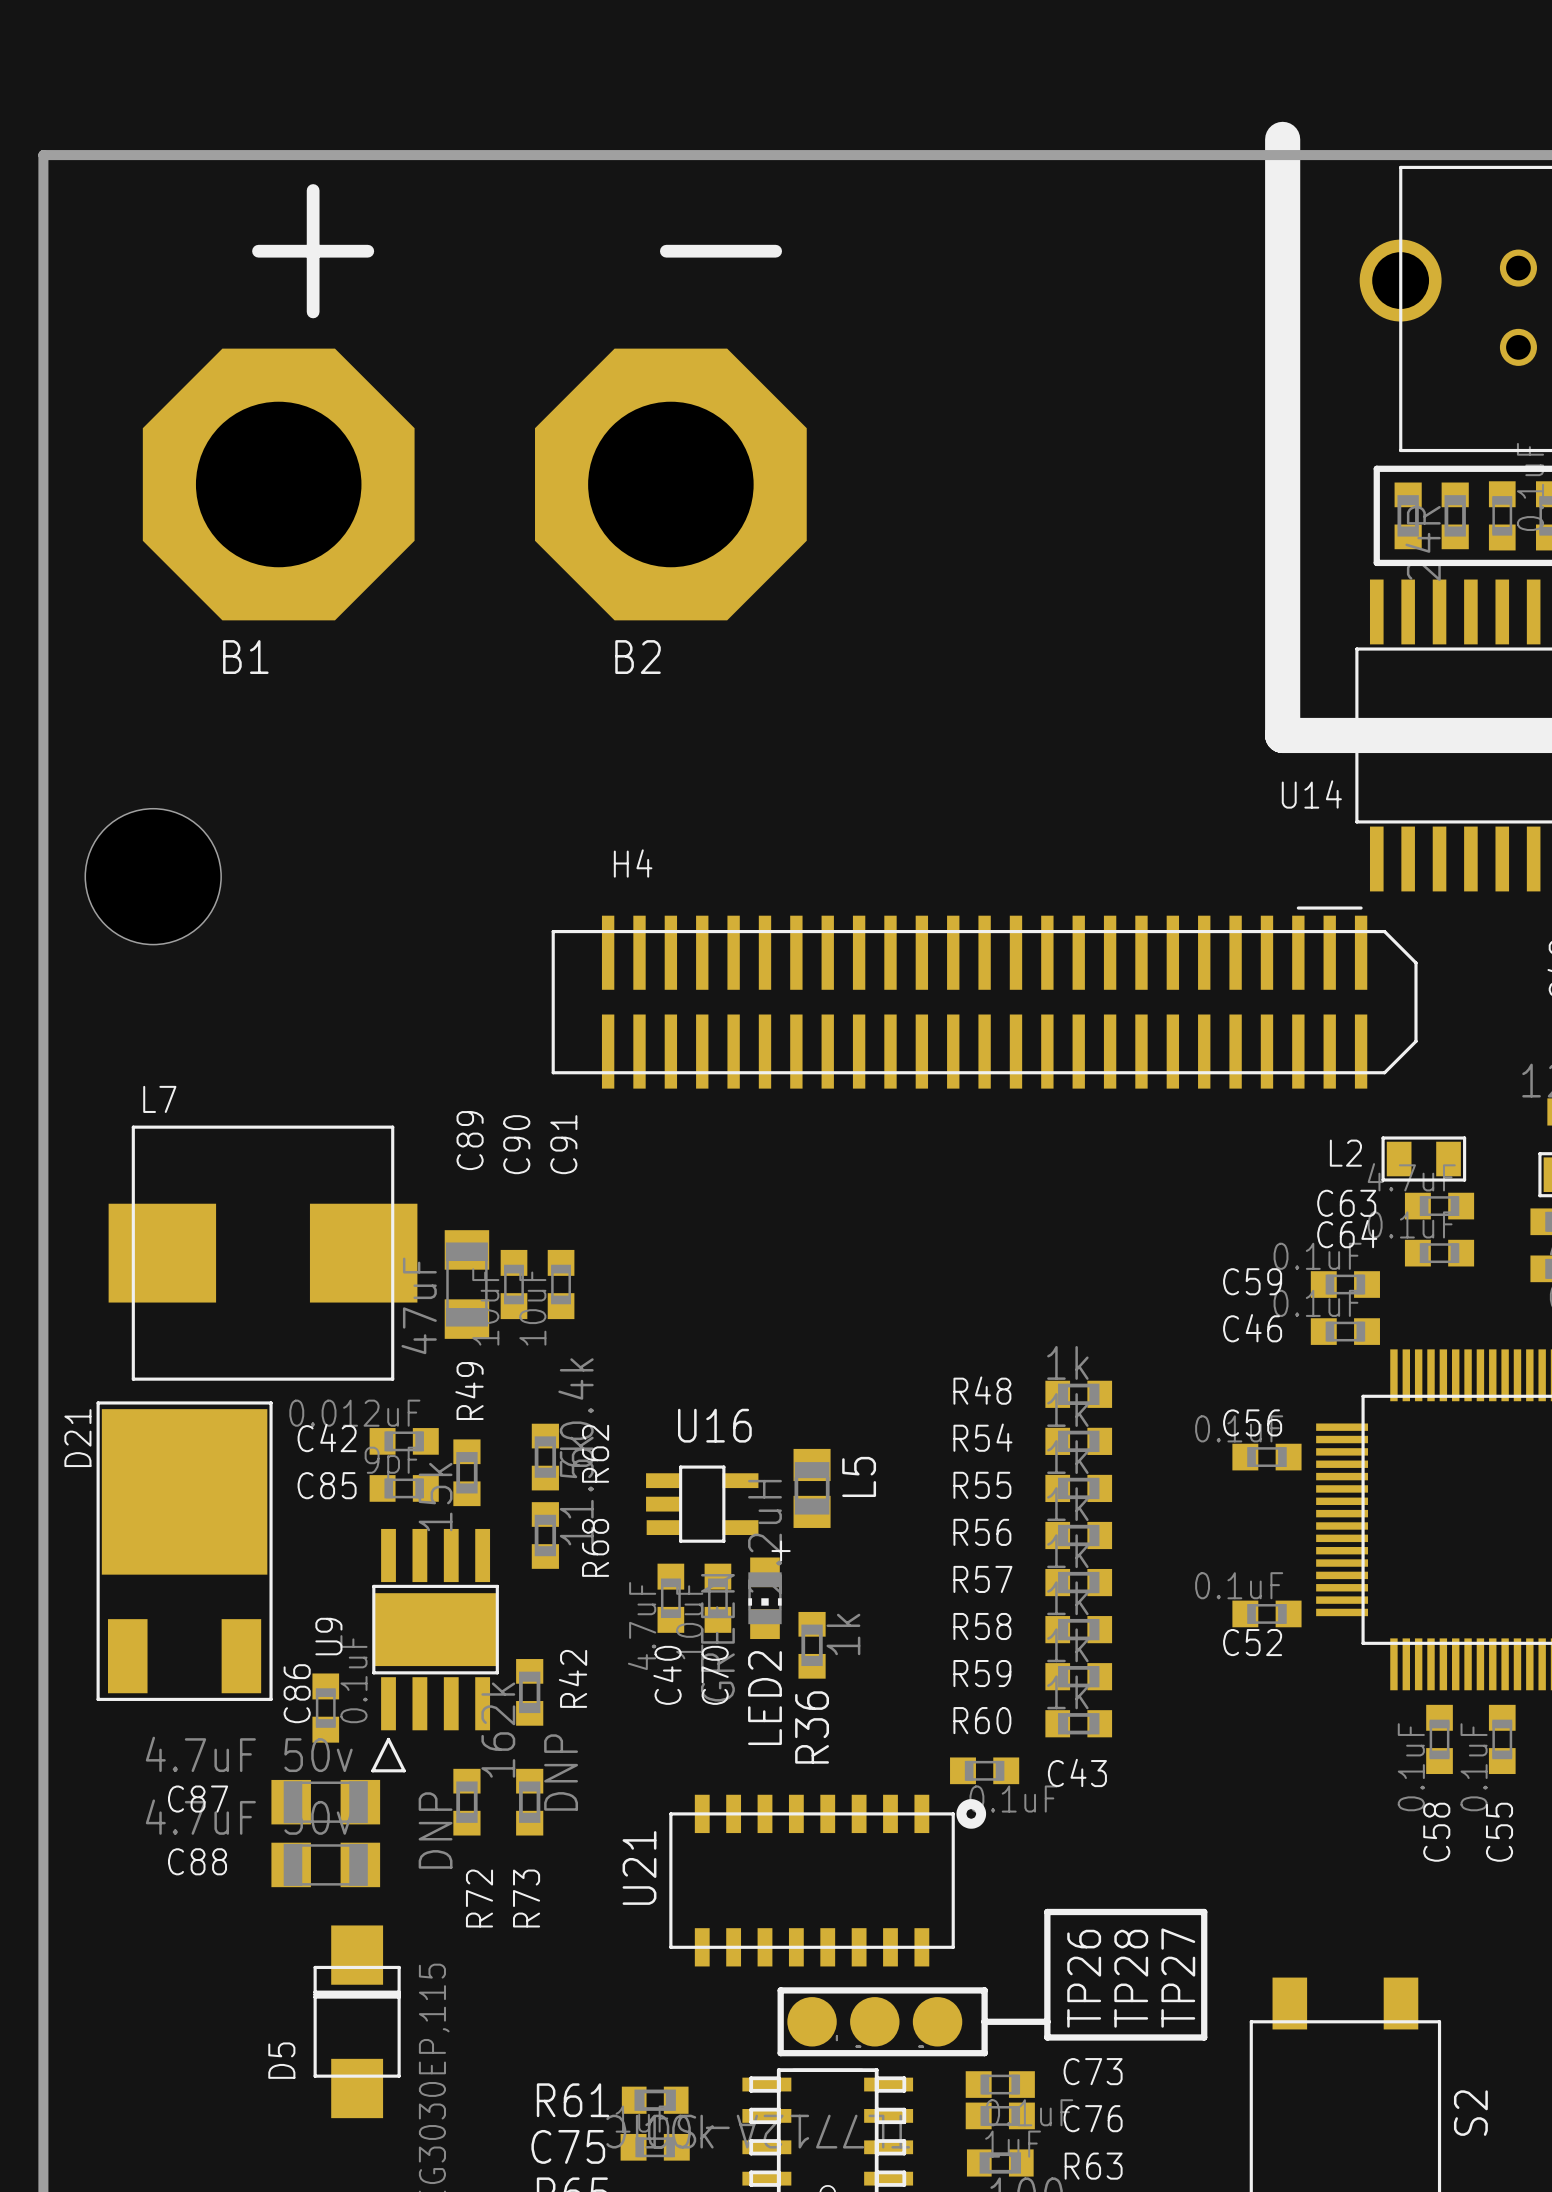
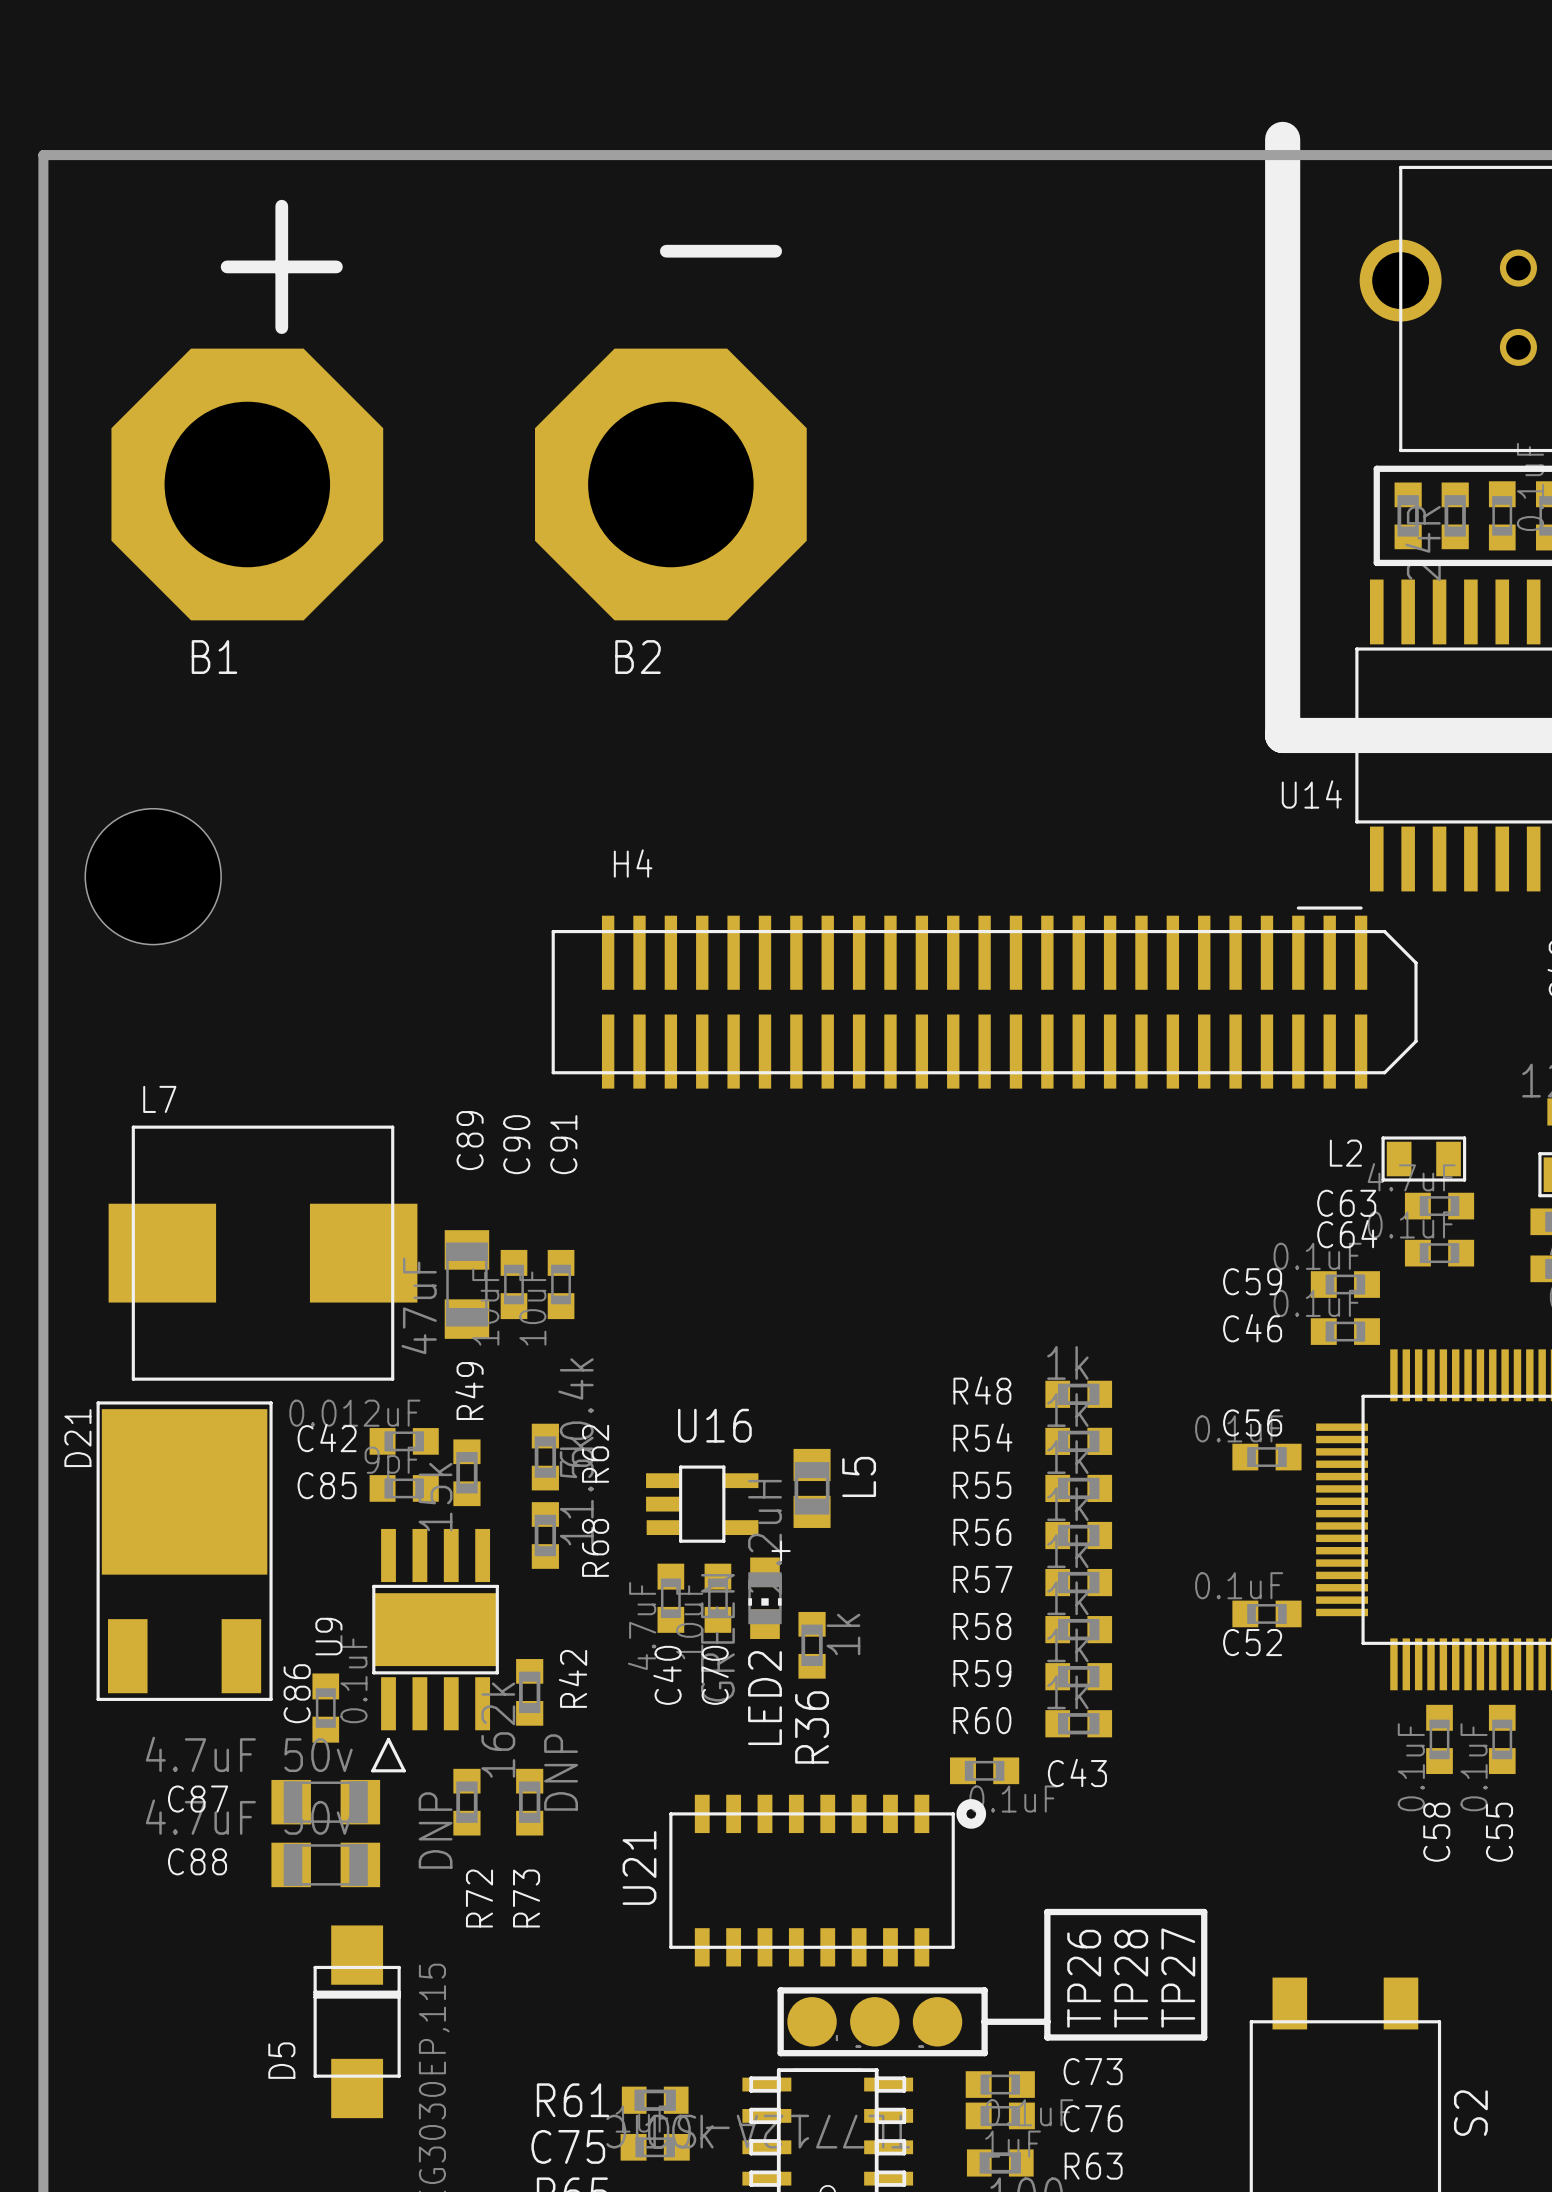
text position: + (313, 251) -> + (281, 266)
B1 position: (278, 484) -> (247, 484)

